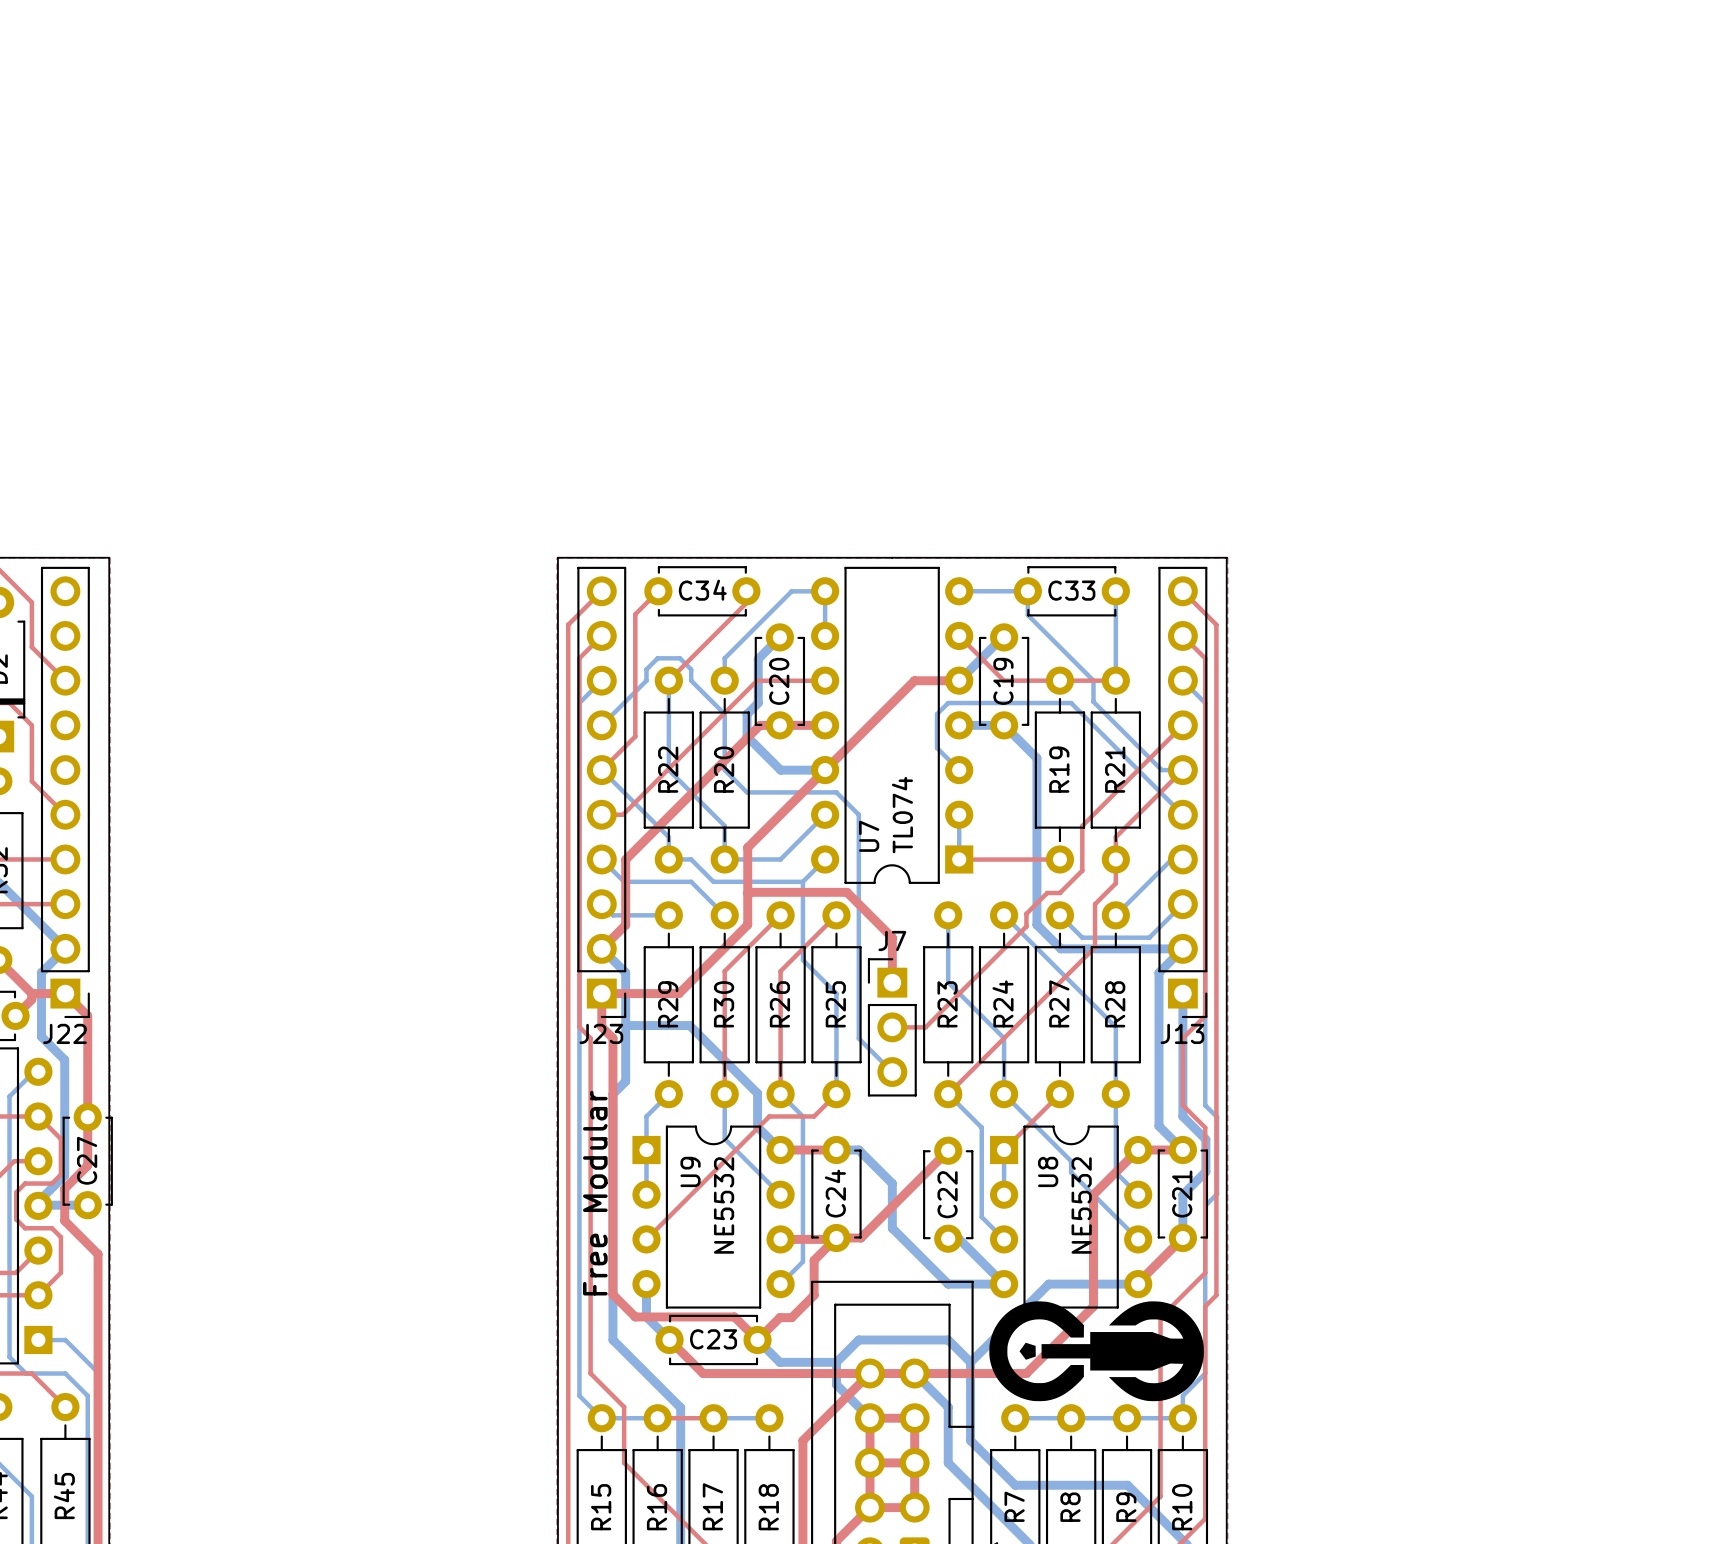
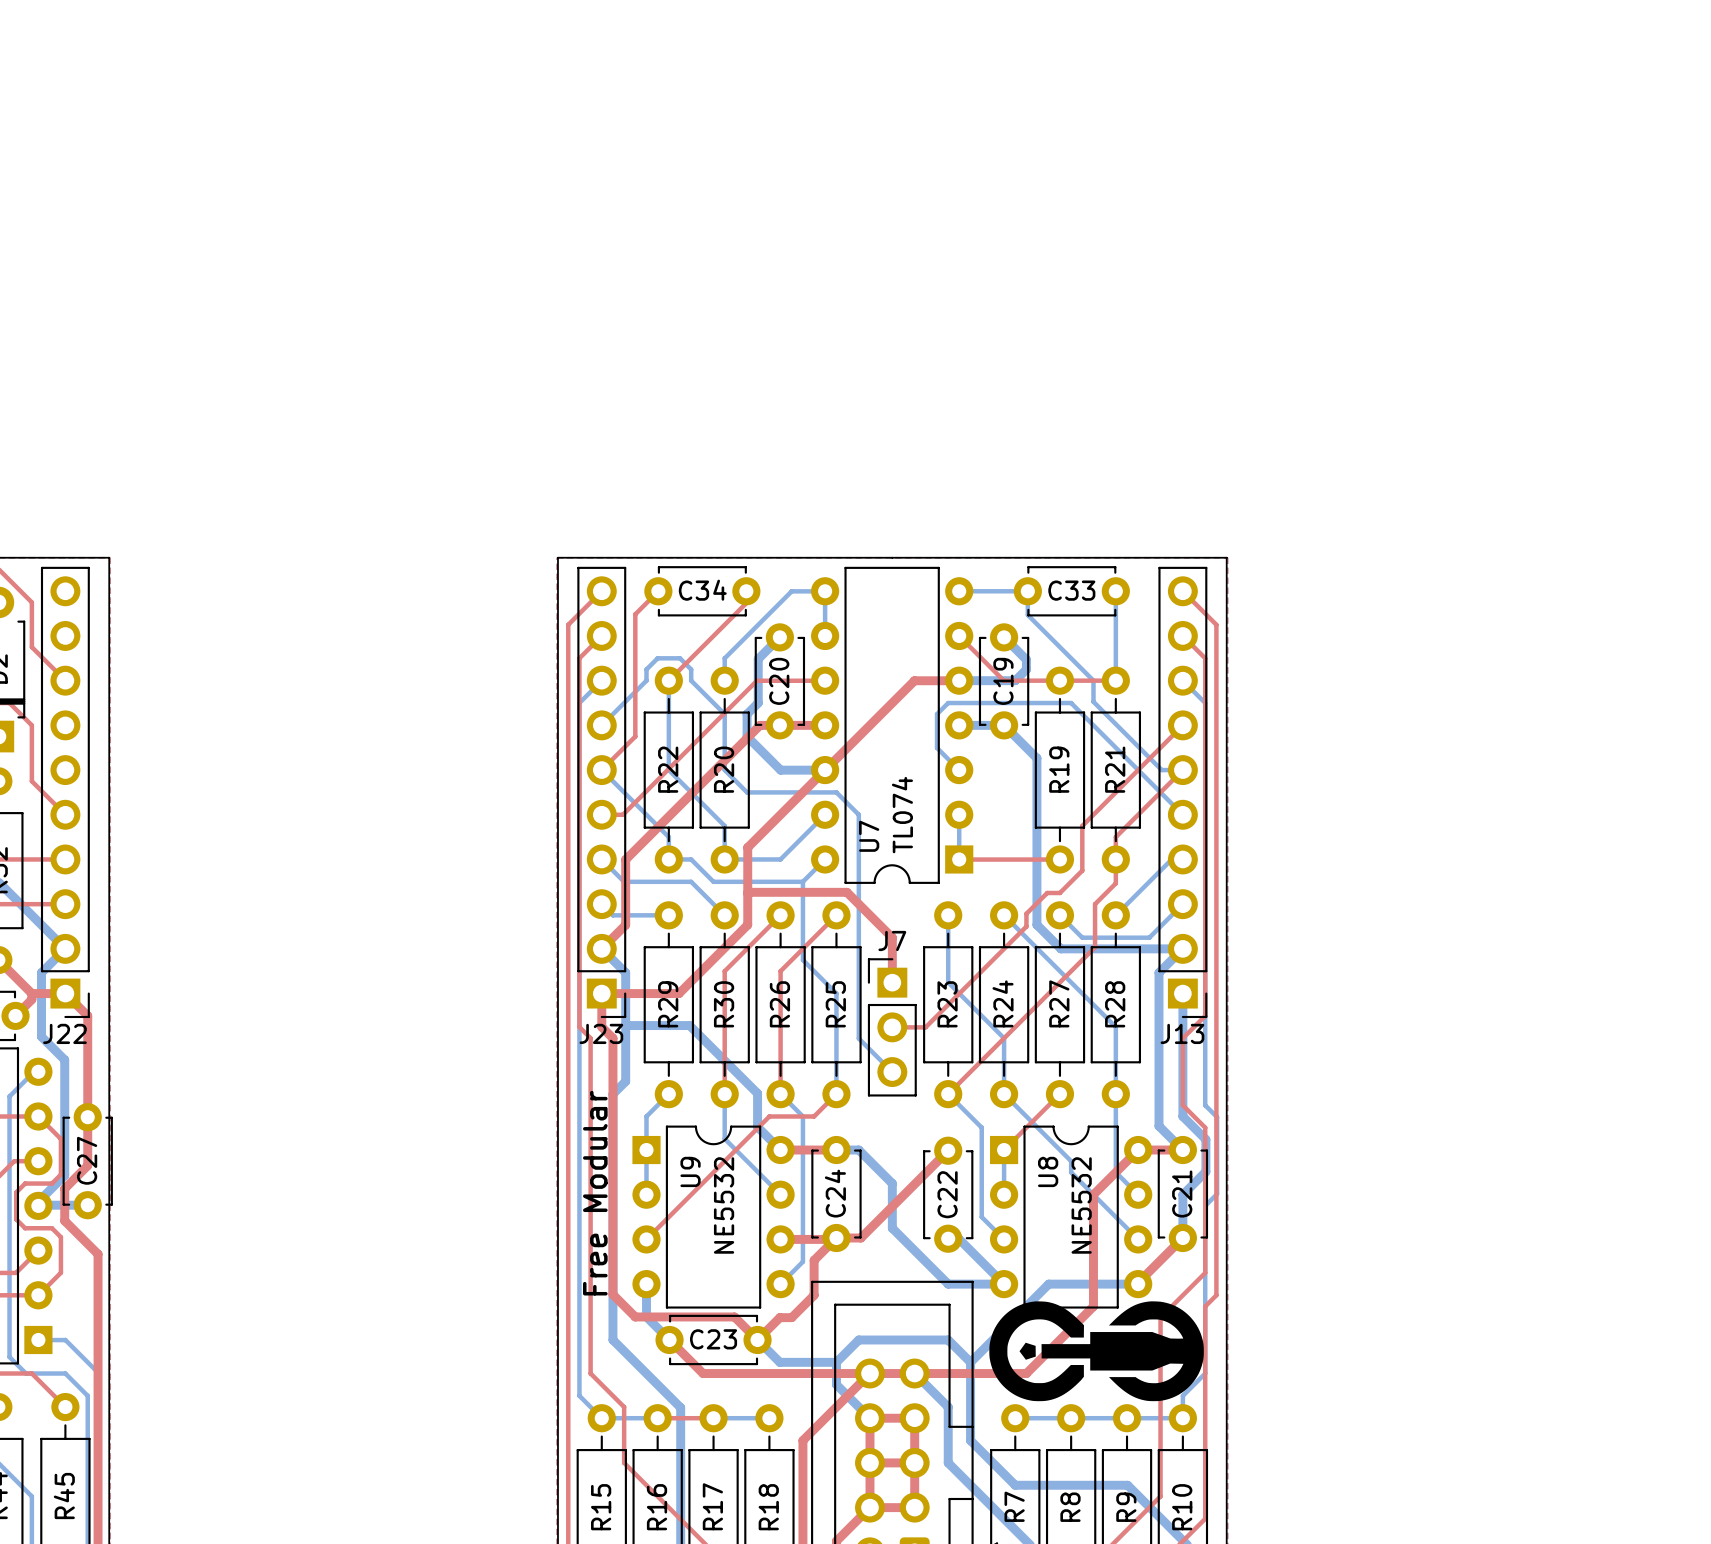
bottom track: (1002, 637) (959, 680) -> (1004, 637) (1026, 659) (1026, 669) (1015, 680) (959, 680)

